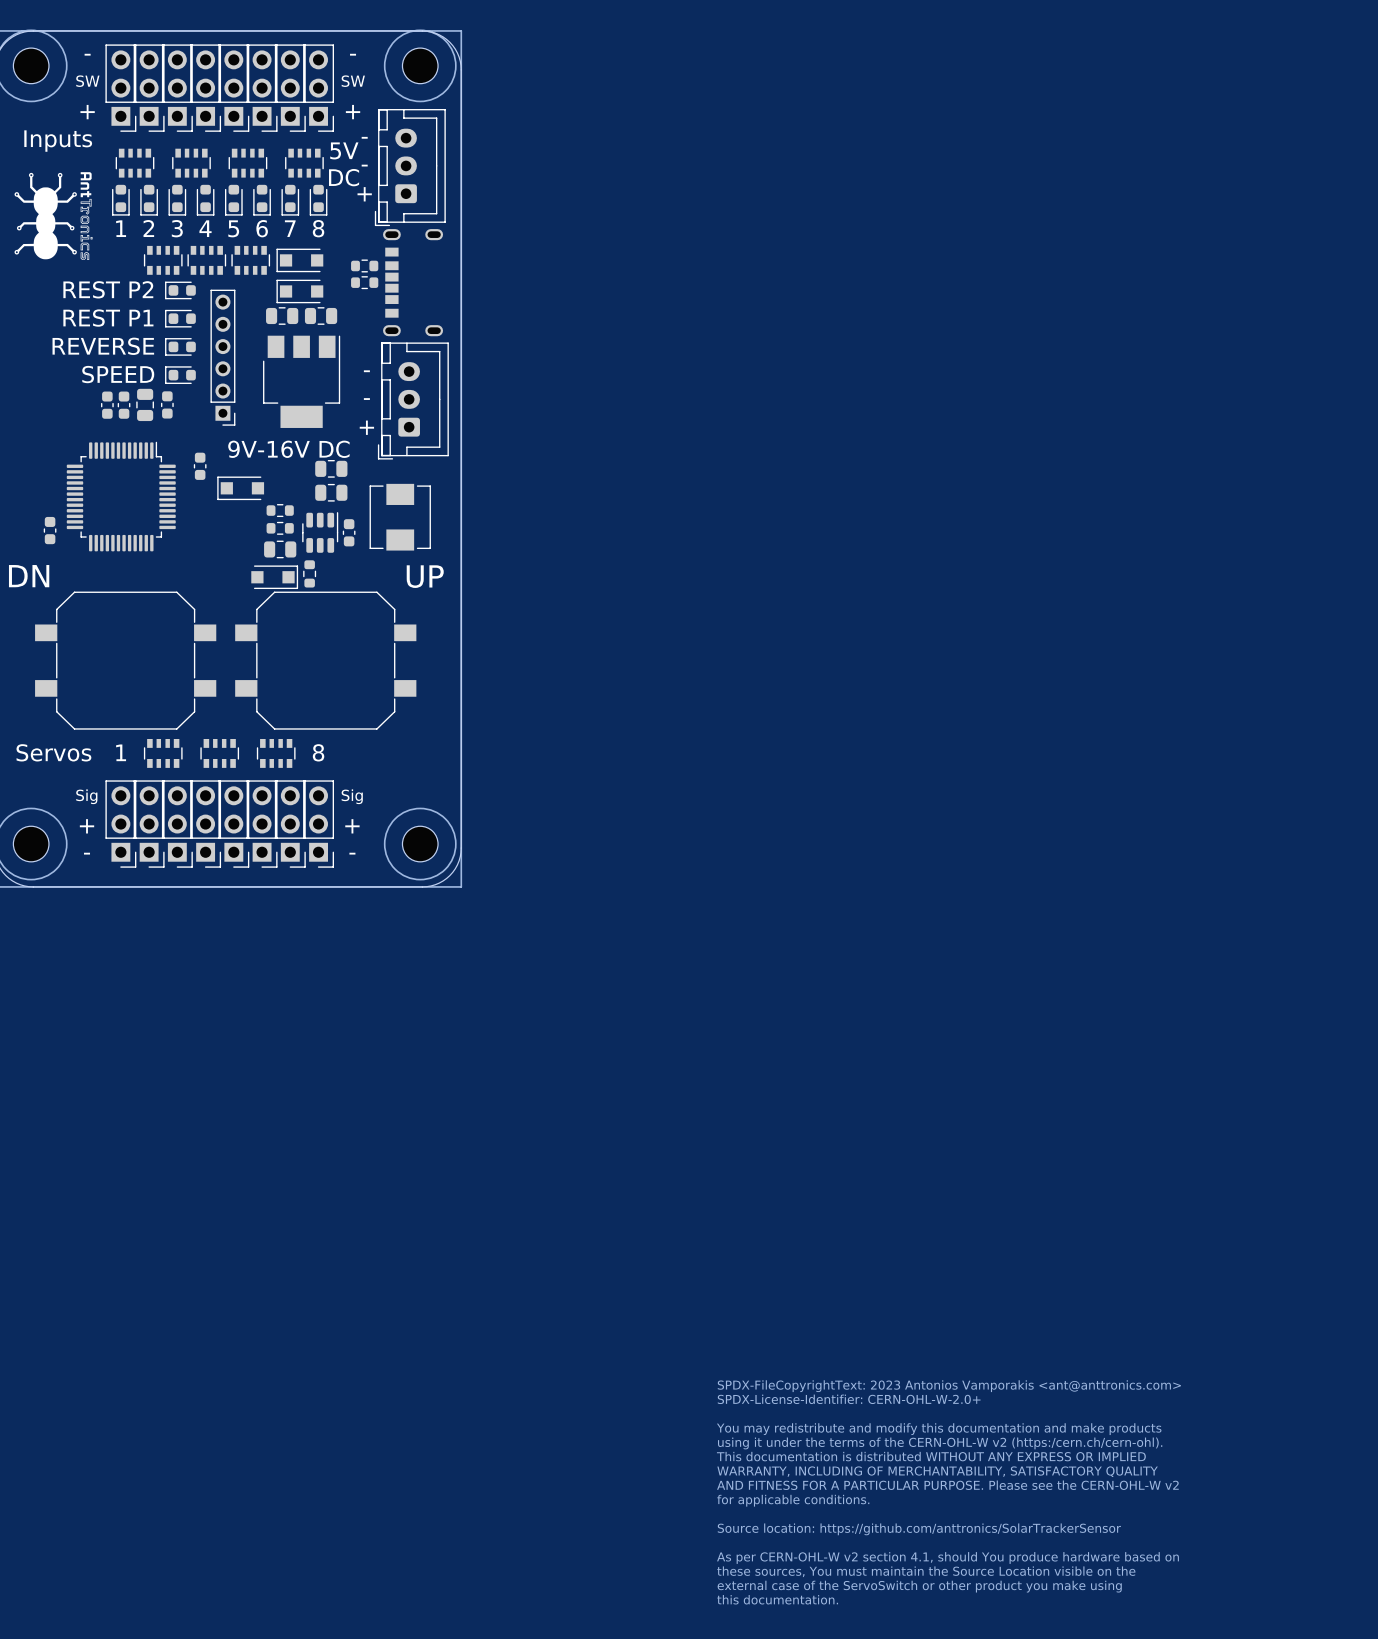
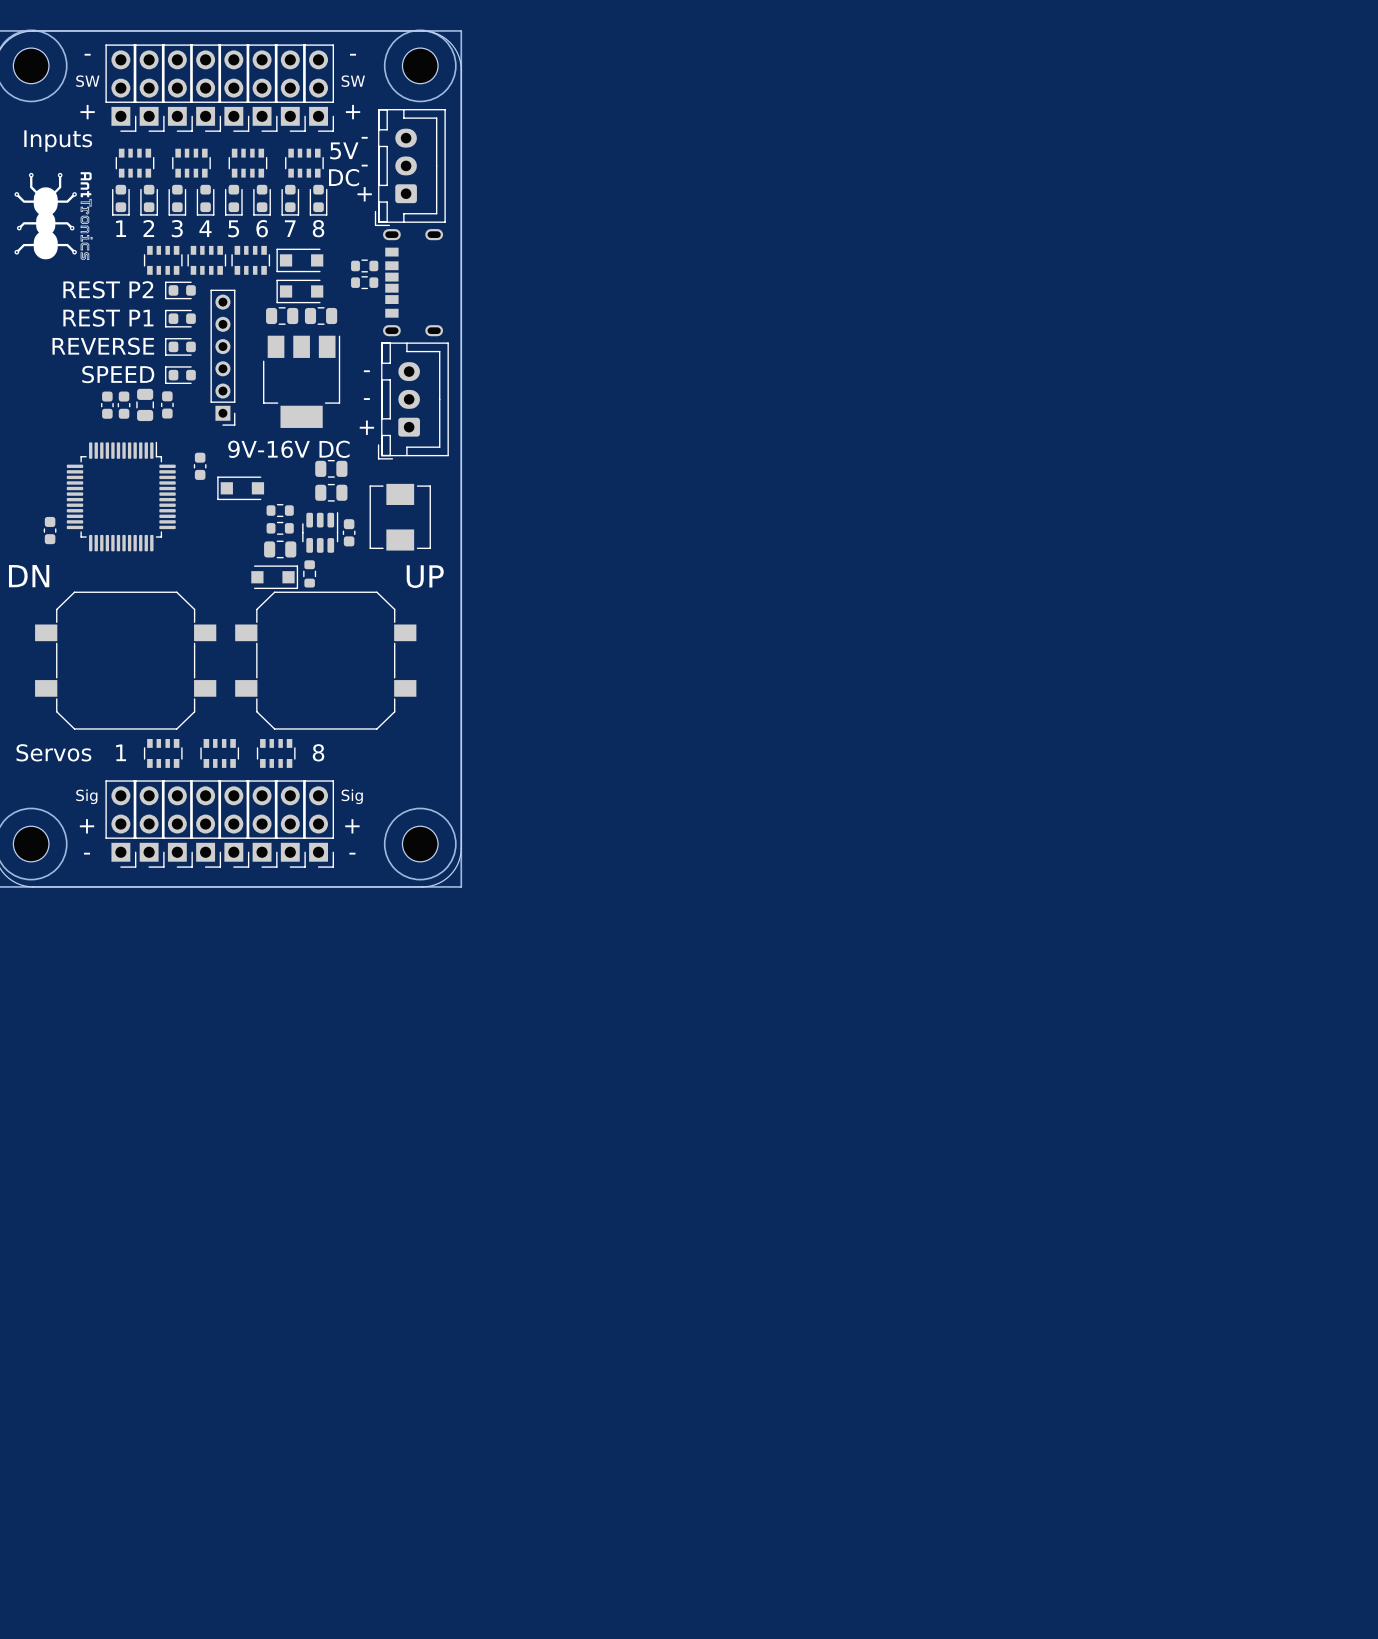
text: SPDX-FileCopyrightText: 2023 Antonios Vamporakis <ant@anttronics.com> (949, 1386) -> none
text: SPDX-License-Identifier: CERN-OHL-W-2.0+ (849, 1399) -> none
text: You may redistribute and modify this documentation and make products (939, 1429) -> none
text: using it under the terms of the CERN-OHL-W v2 (https:/cern.ch/cern-ohl). (940, 1443) -> none
text: This documentation is distributed WITHOUT ANY EXPRESS OR IMPLIED (931, 1456) -> none
text: WARRANTY, INCLUDING OF MERCHANTABILITY, SATISFACTORY QUALITY (937, 1471) -> none
text: AND FITNESS FOR A PARTICULAR PURPOSE. Please see the CERN-OHL-W v2 (947, 1485) -> none
text: for applicable conditions. (793, 1500) -> none
text: Source location: https://github.com/anttronics/SolarTrackerSensor (919, 1529) -> none
text: As per CERN-OHL-W v2 section 4.1, should You produce hardware based on (947, 1557) -> none
text: these sources, You must maintain the Source Location visible on the (926, 1571) -> none
text: external case of the ServoSwitch or other product you make using (919, 1586) -> none
text: this documentation. (777, 1599) -> none

